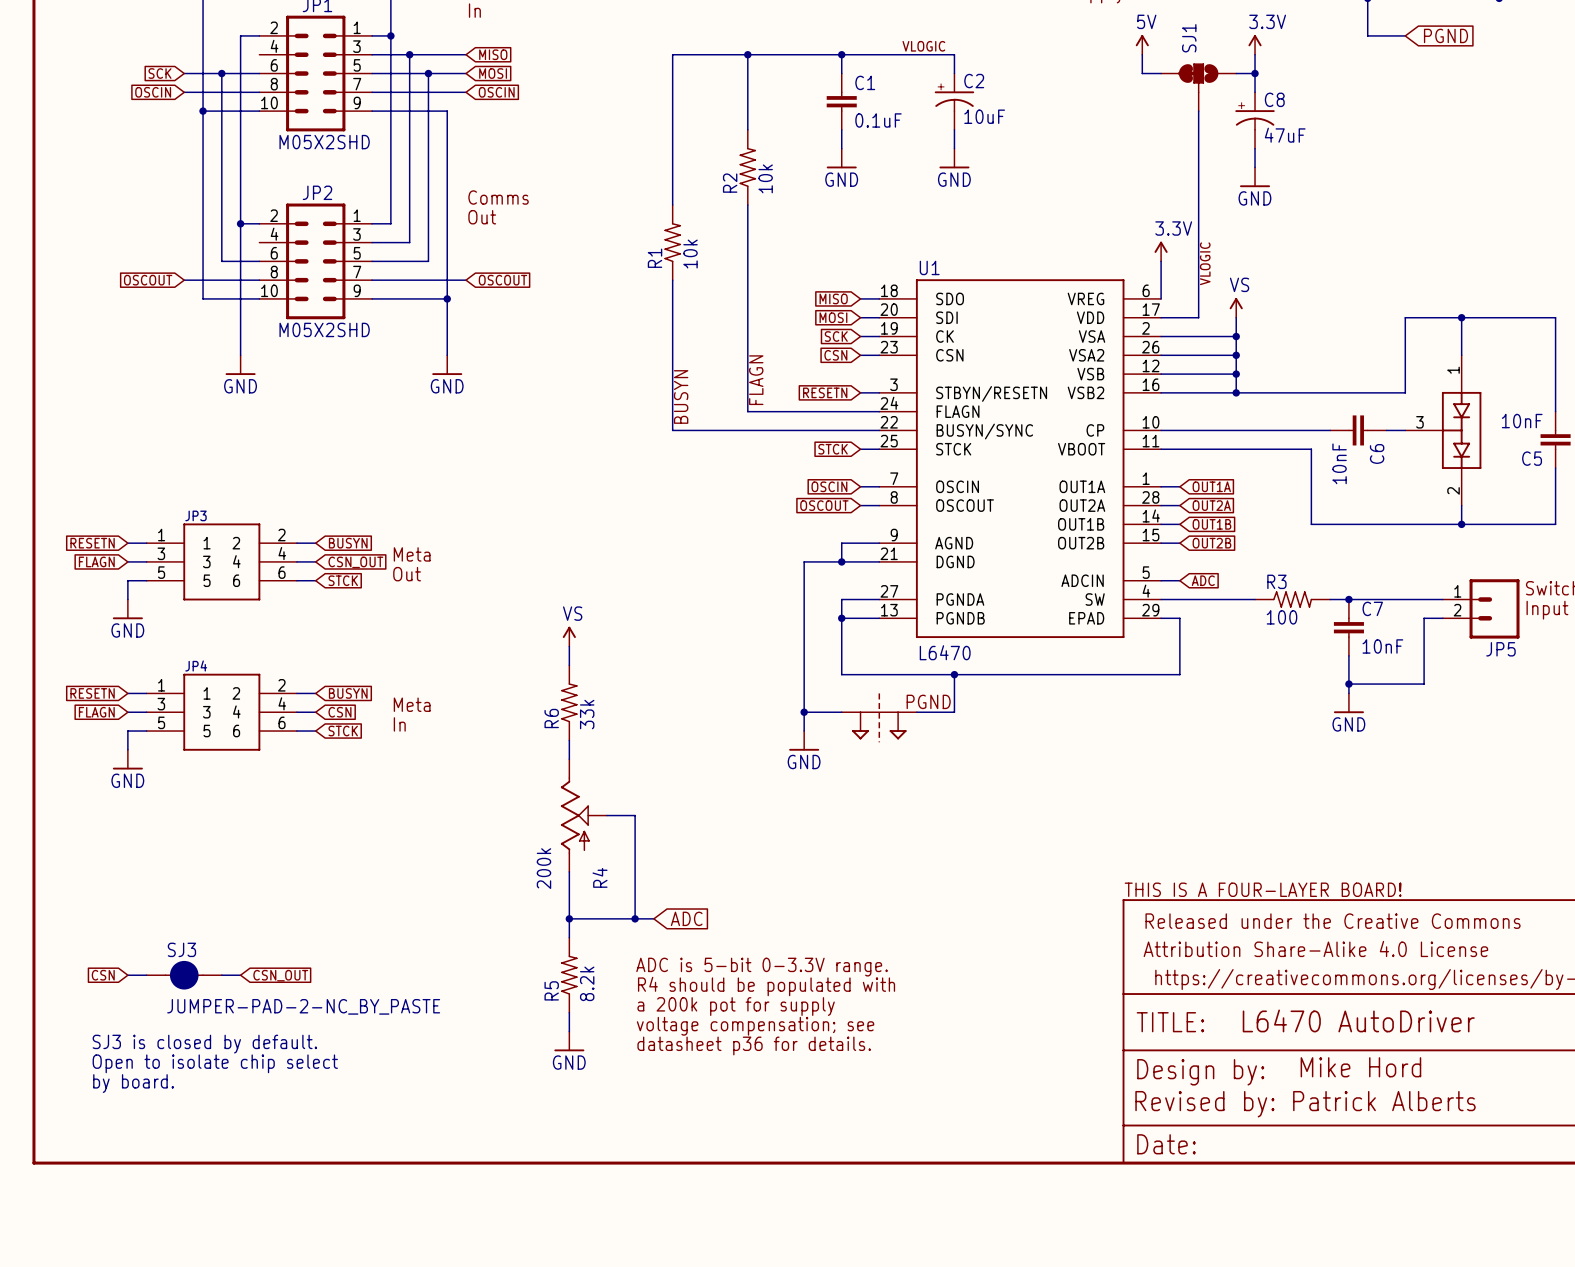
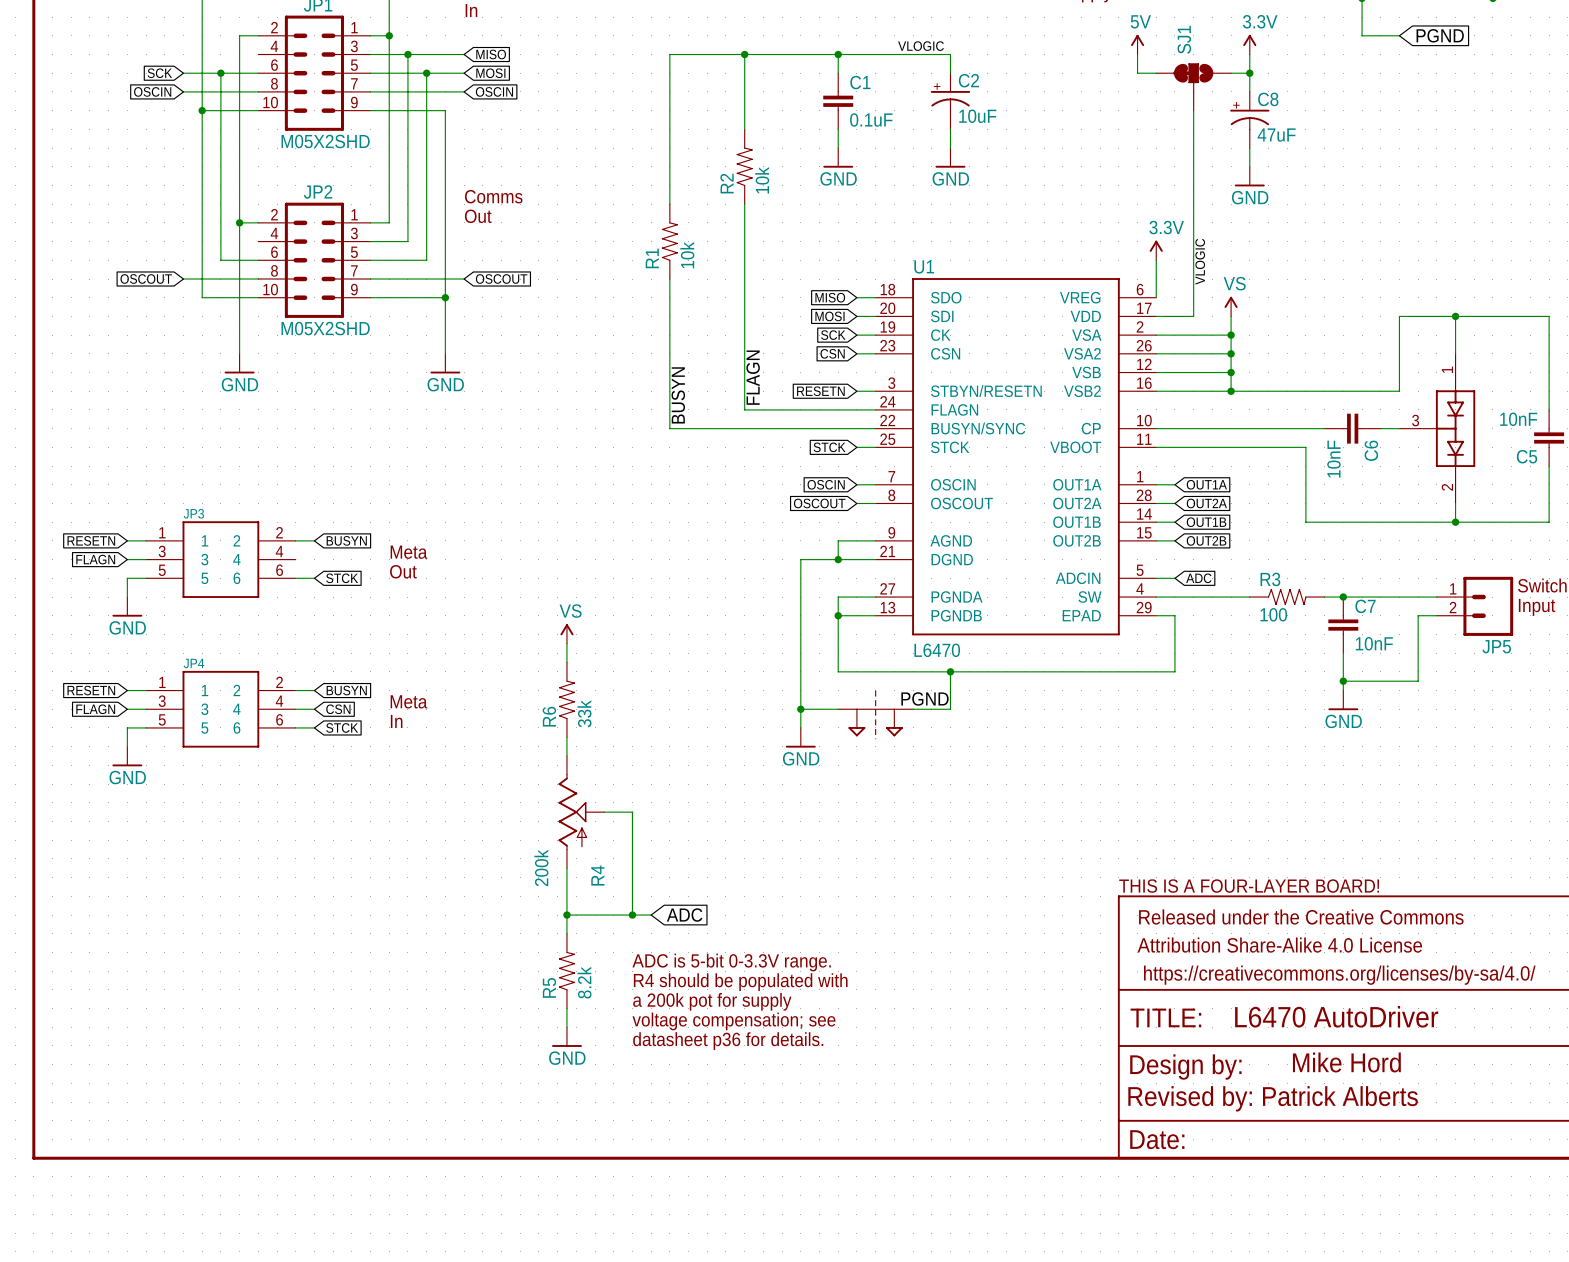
wire: (296, 561) (315, 561) -> none
global label: CSN_OUT (355, 562) -> none
global label: CSN (103, 975) -> none
wire: (127, 975) (146, 975) -> none
SJ3: JUMPER-PAD-2-NC_BY_PASTE (184, 975) -> none
wire: (221, 975) (240, 975) -> none
global label: CSN_OUT (280, 975) -> none
text: SJ3 is closed by default. (204, 1044) -> none
text: Open to isolate chip select (215, 1063) -> none
text: by board. (133, 1083) -> none

